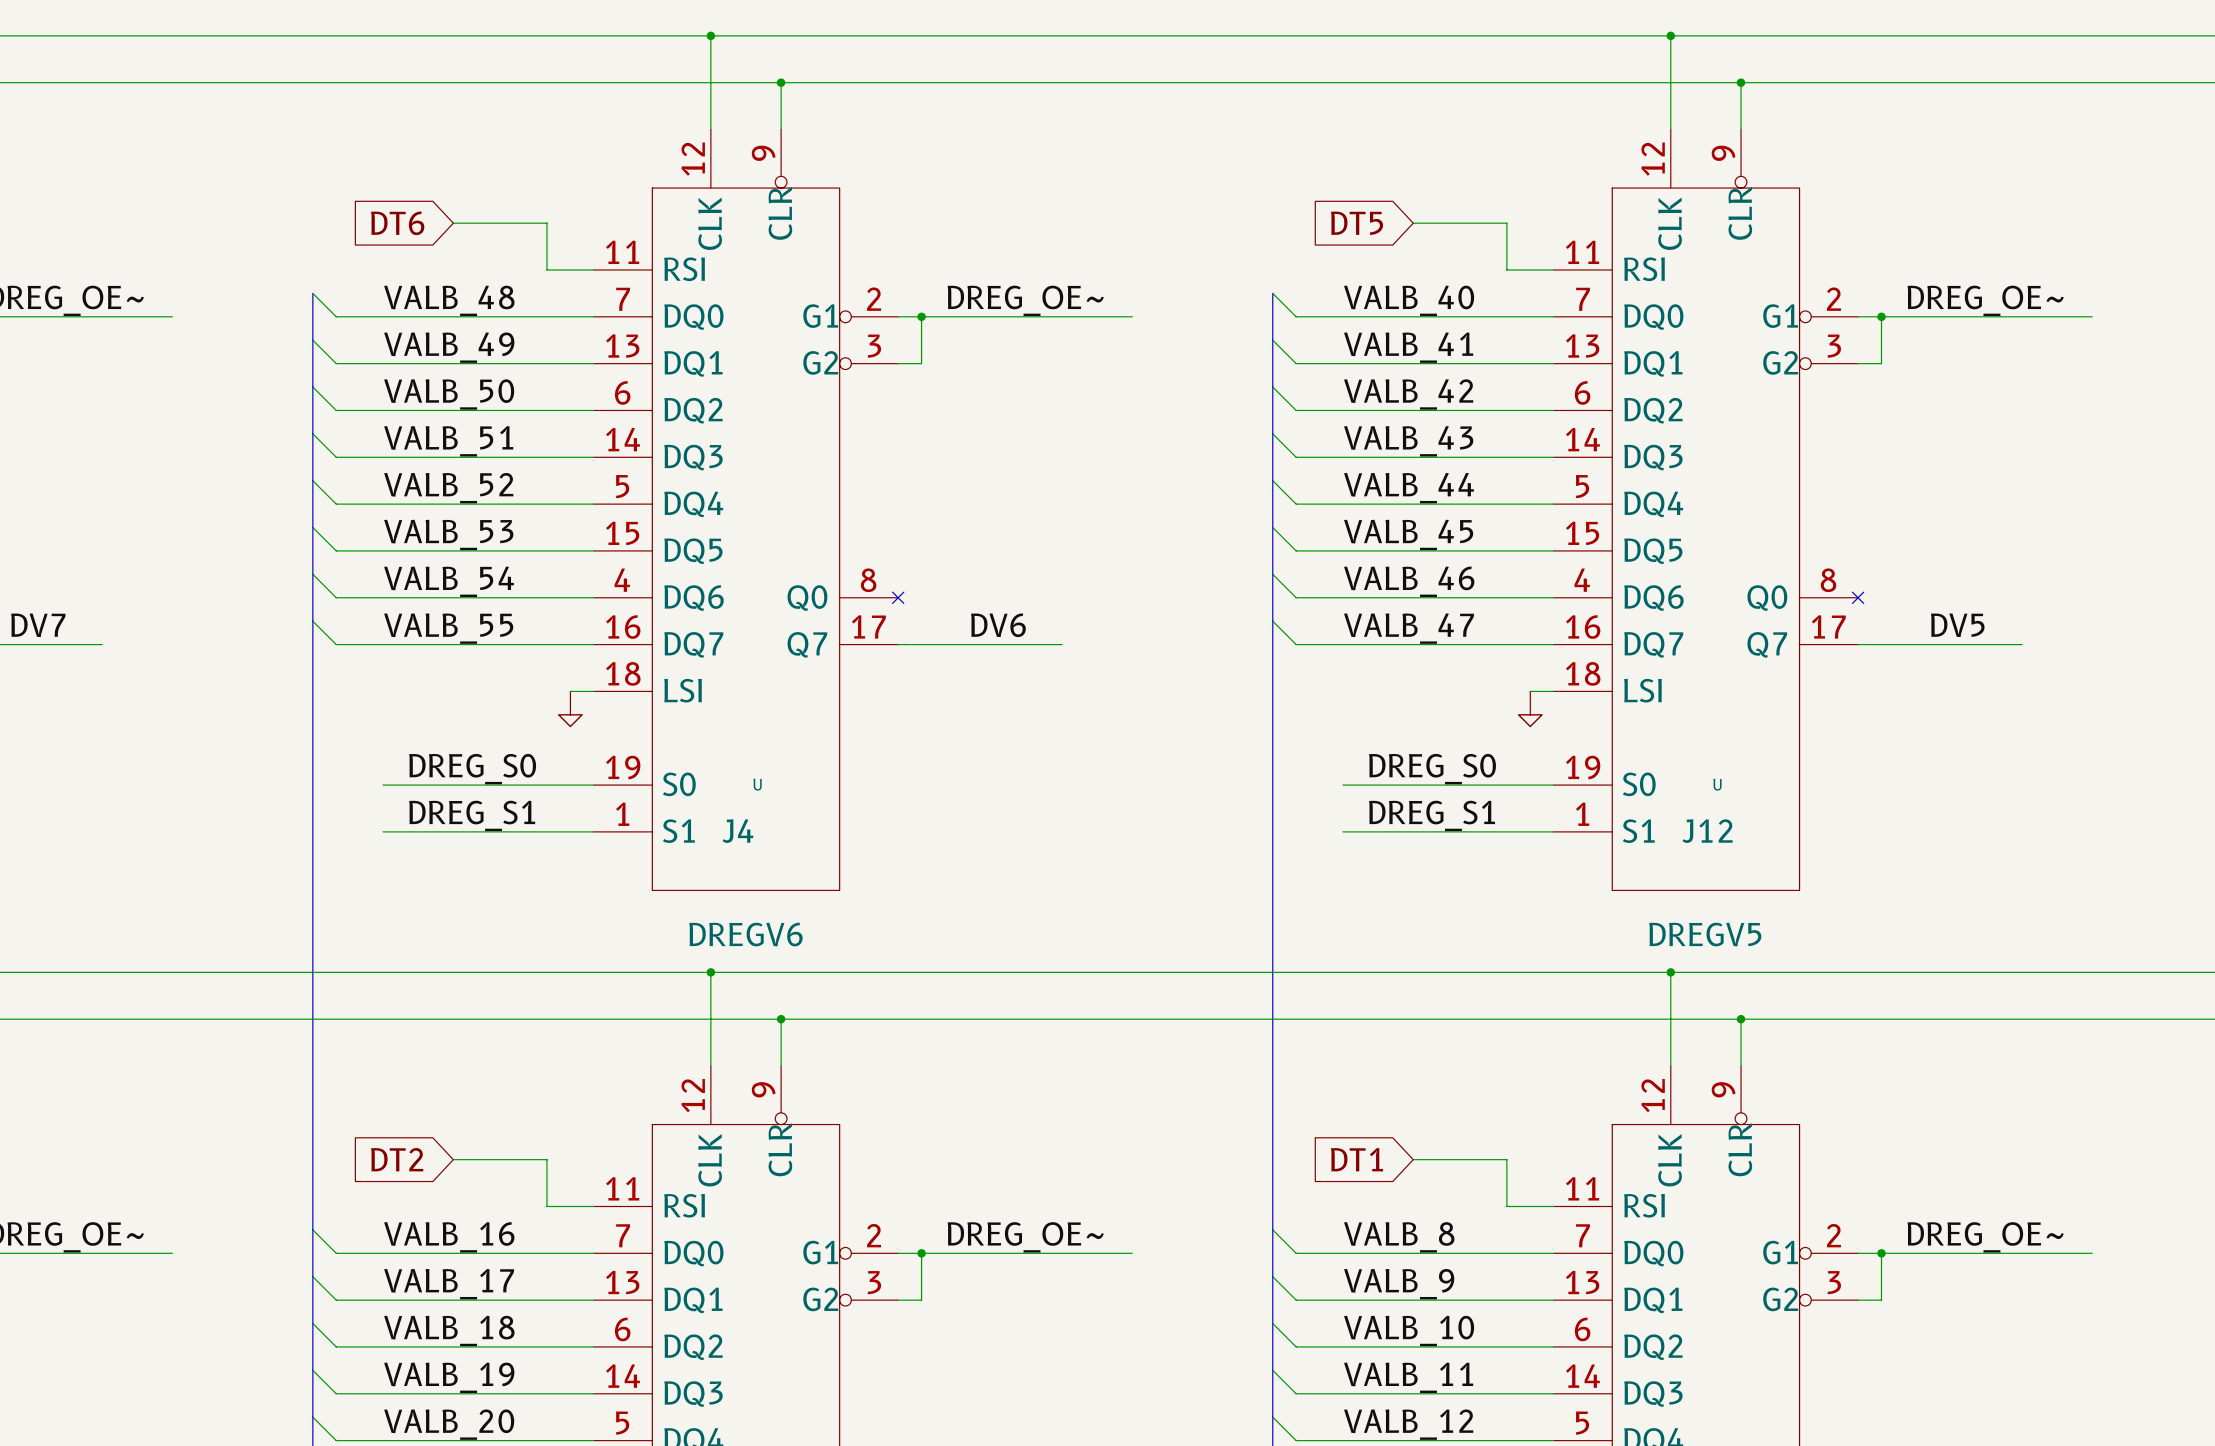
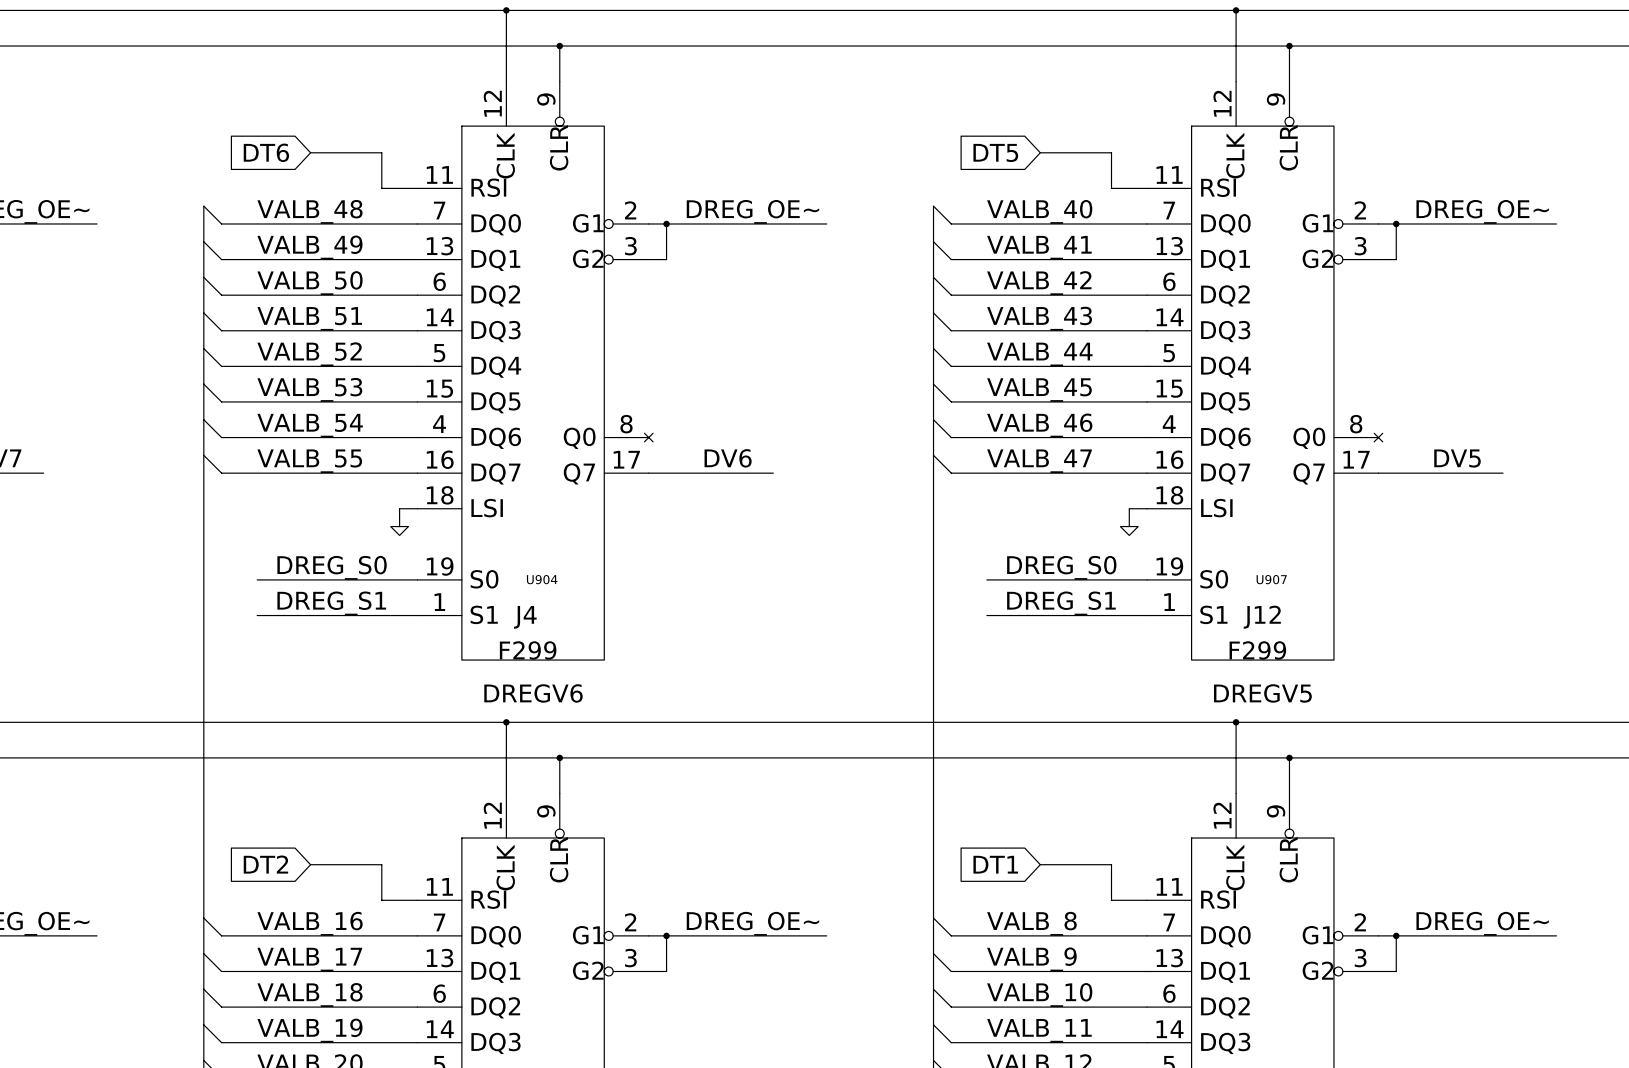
U name: U (757, 784) -> U904 (542, 579)
U name: U (1717, 784) -> U907 (1271, 579)
U value: none -> F299 (528, 650)
U value: none -> F299 (1257, 650)

